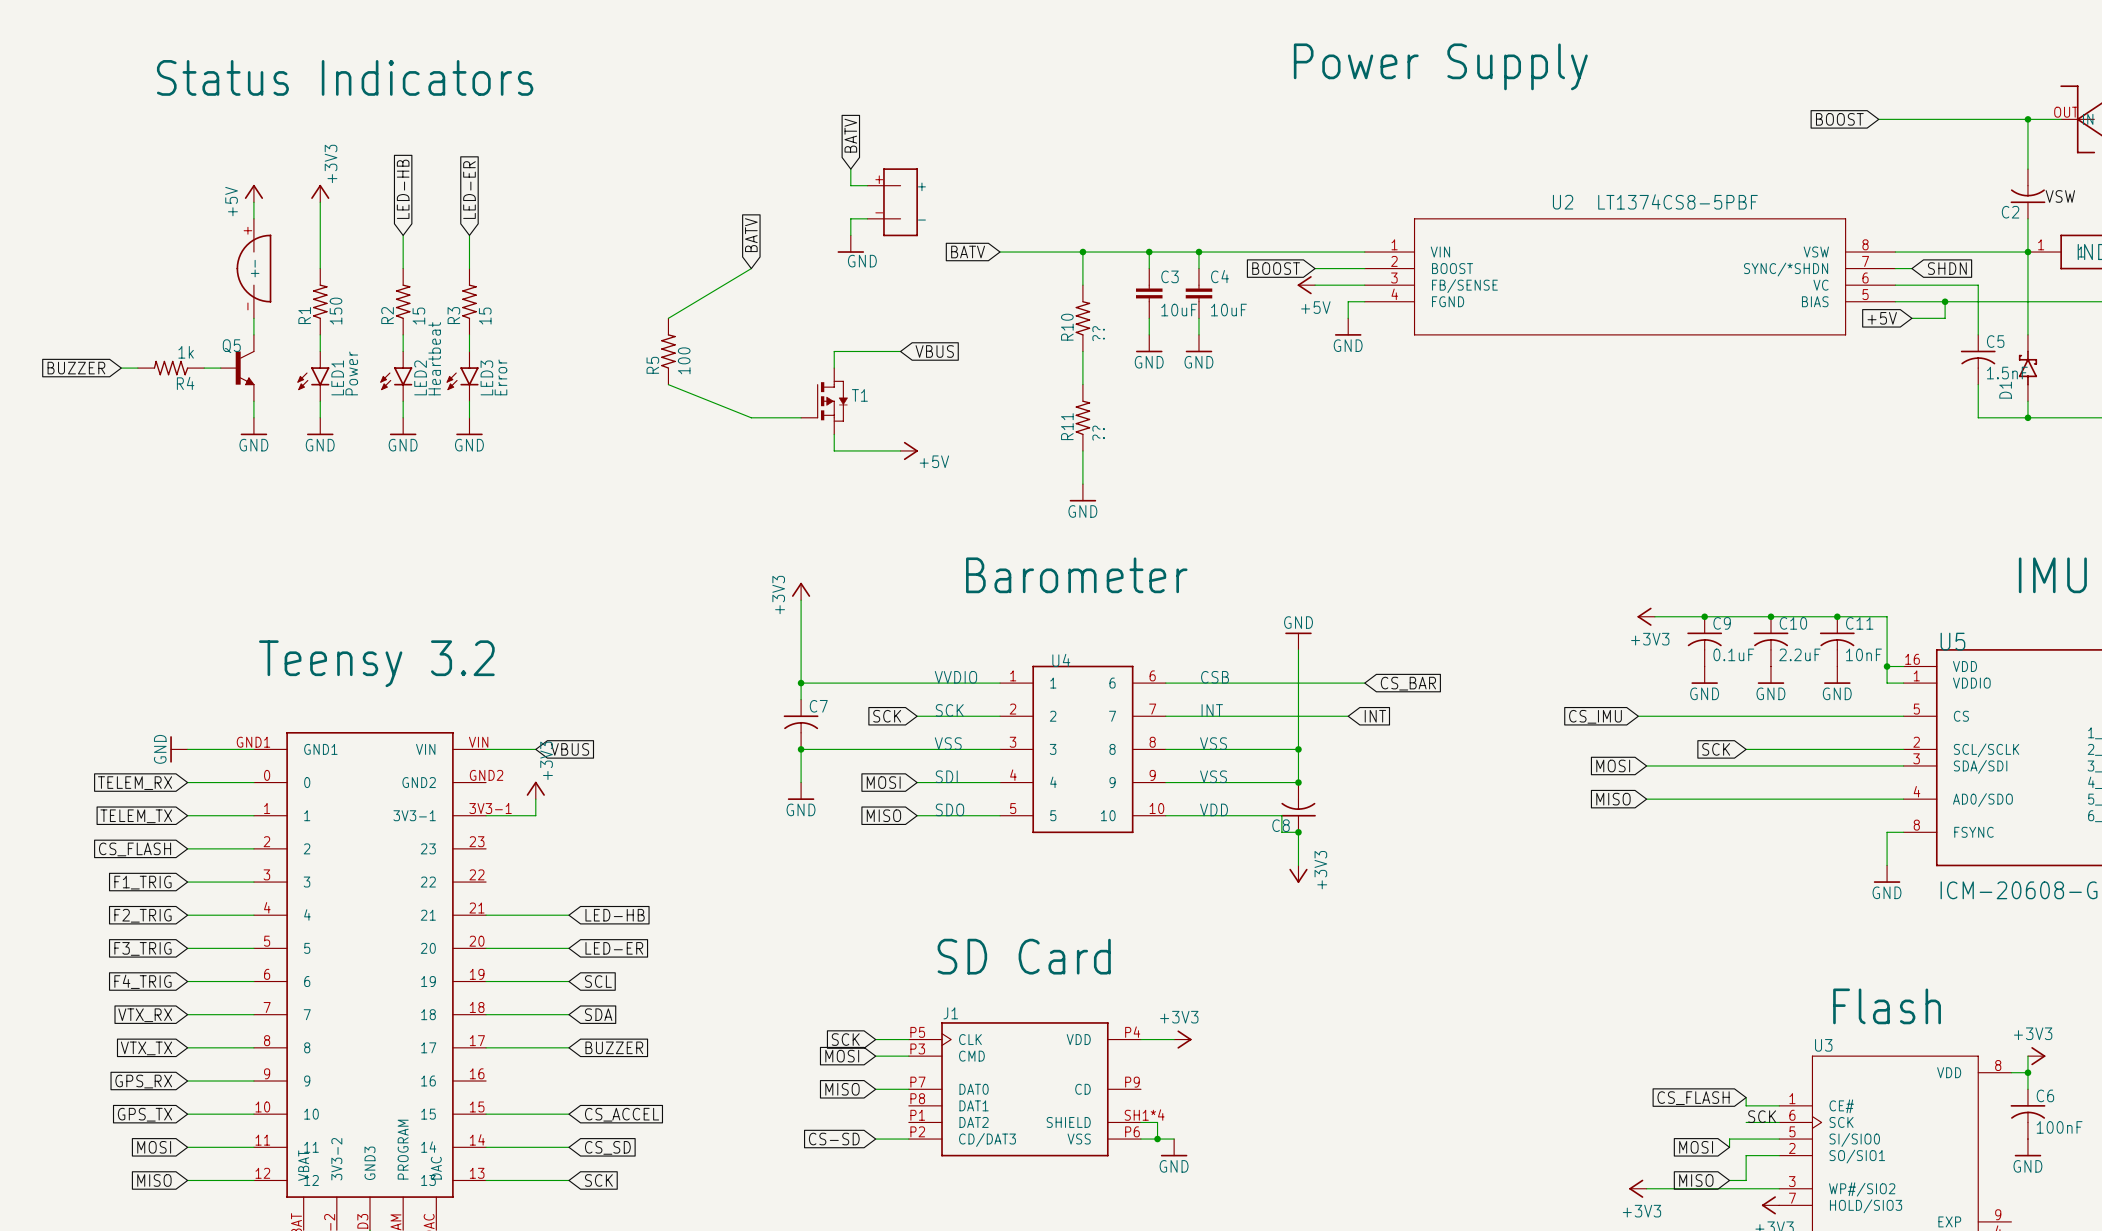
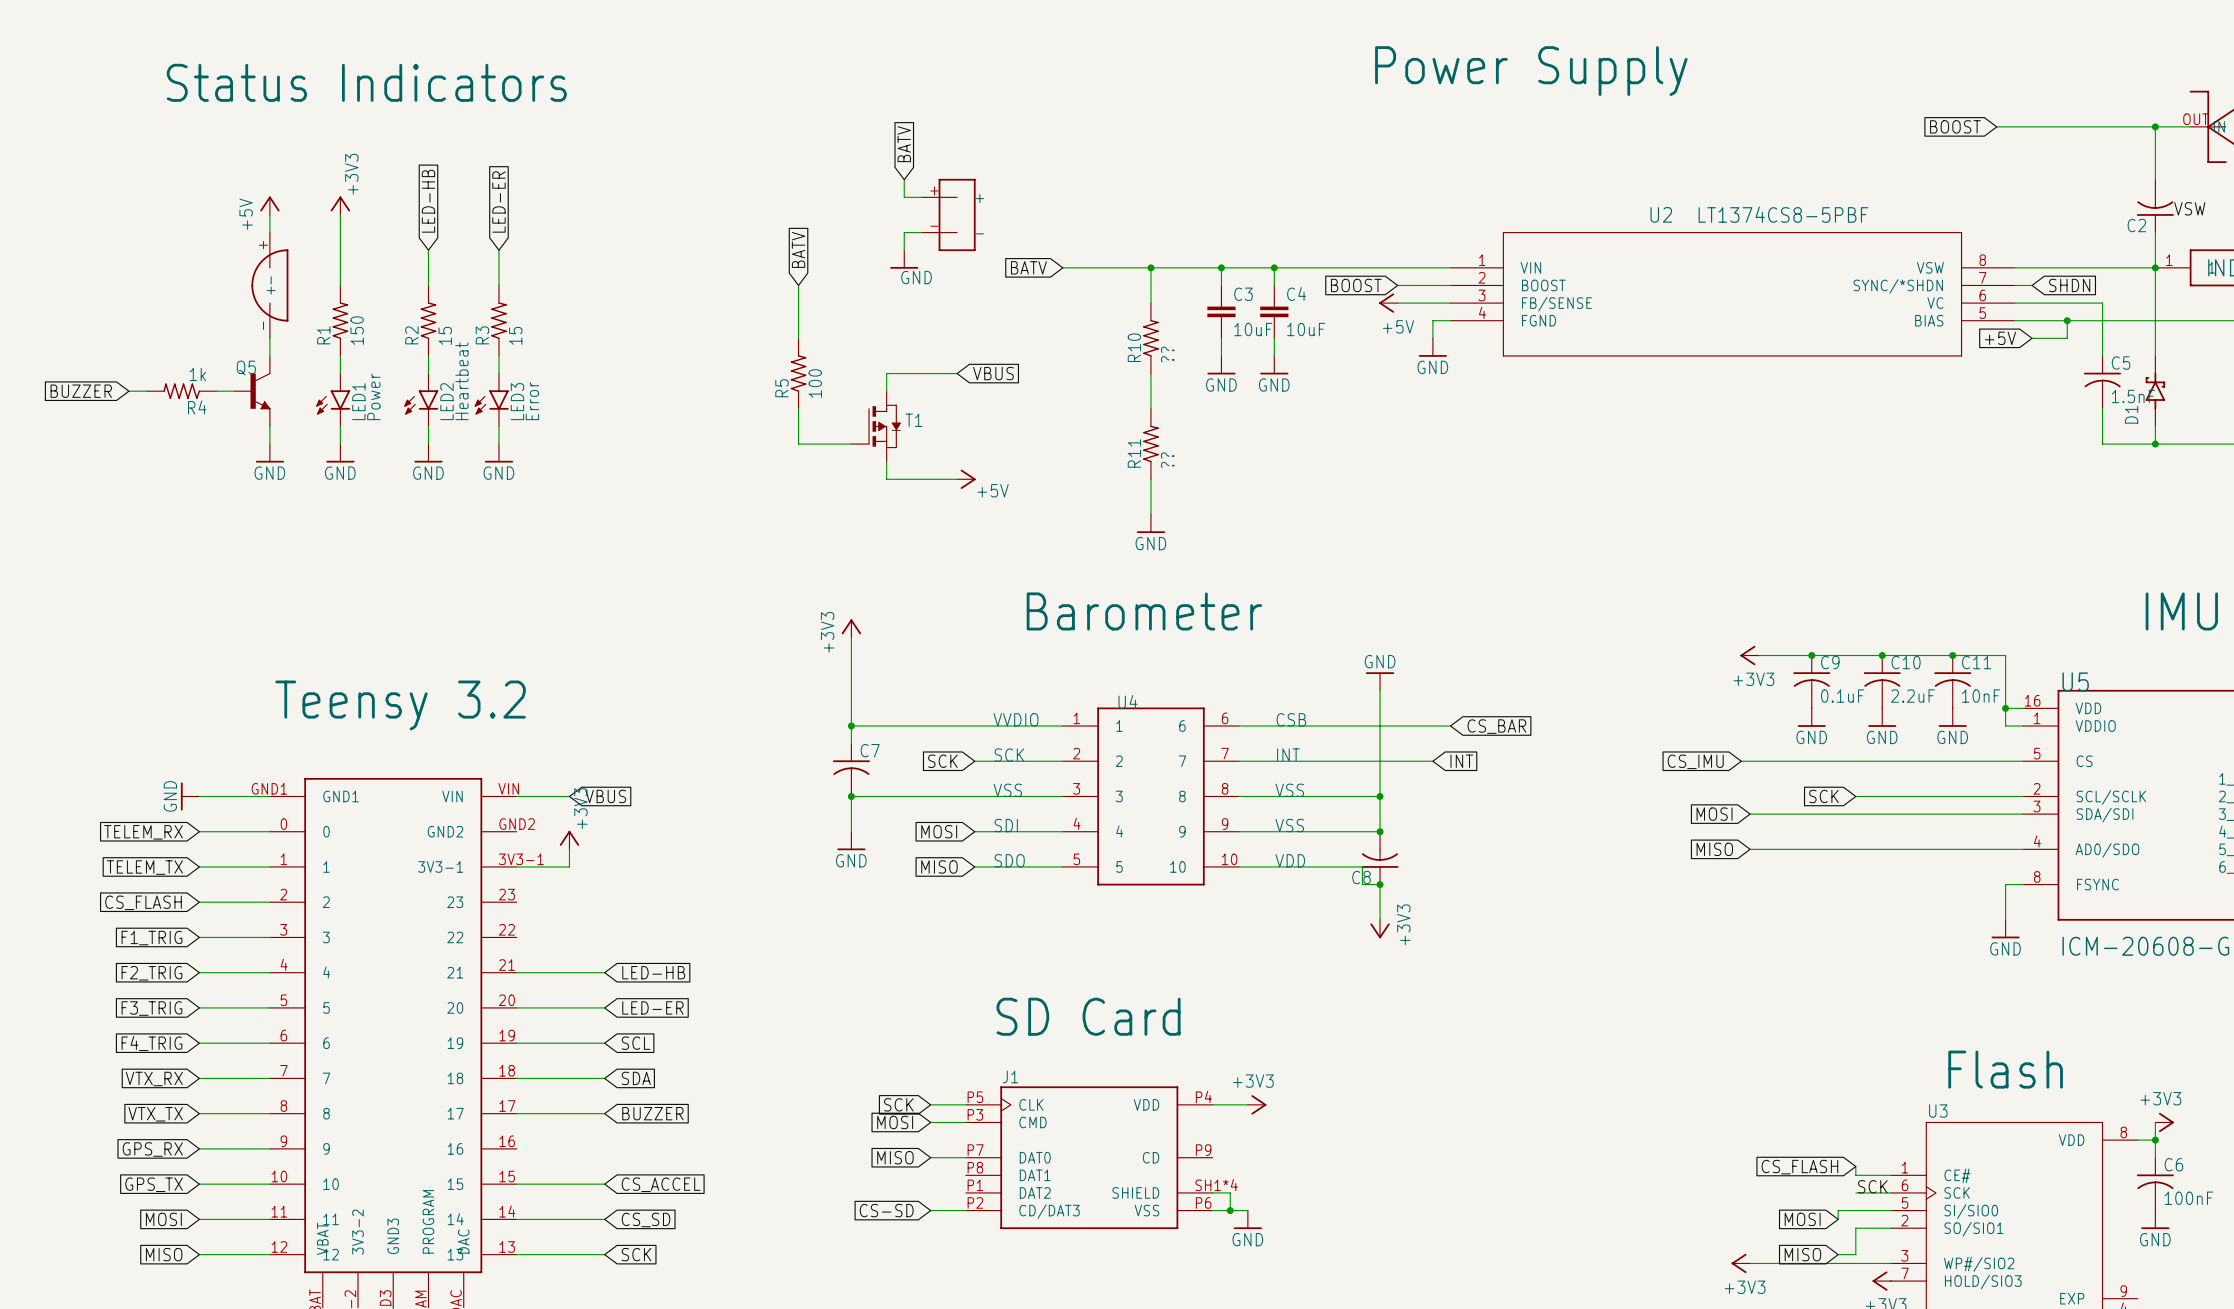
wire: (751, 268) (668, 318) -> (798, 285) (798, 338)
R5 position: (668, 351) -> (798, 373)
wire: (668, 384) (751, 417) -> (798, 408) (798, 444)

